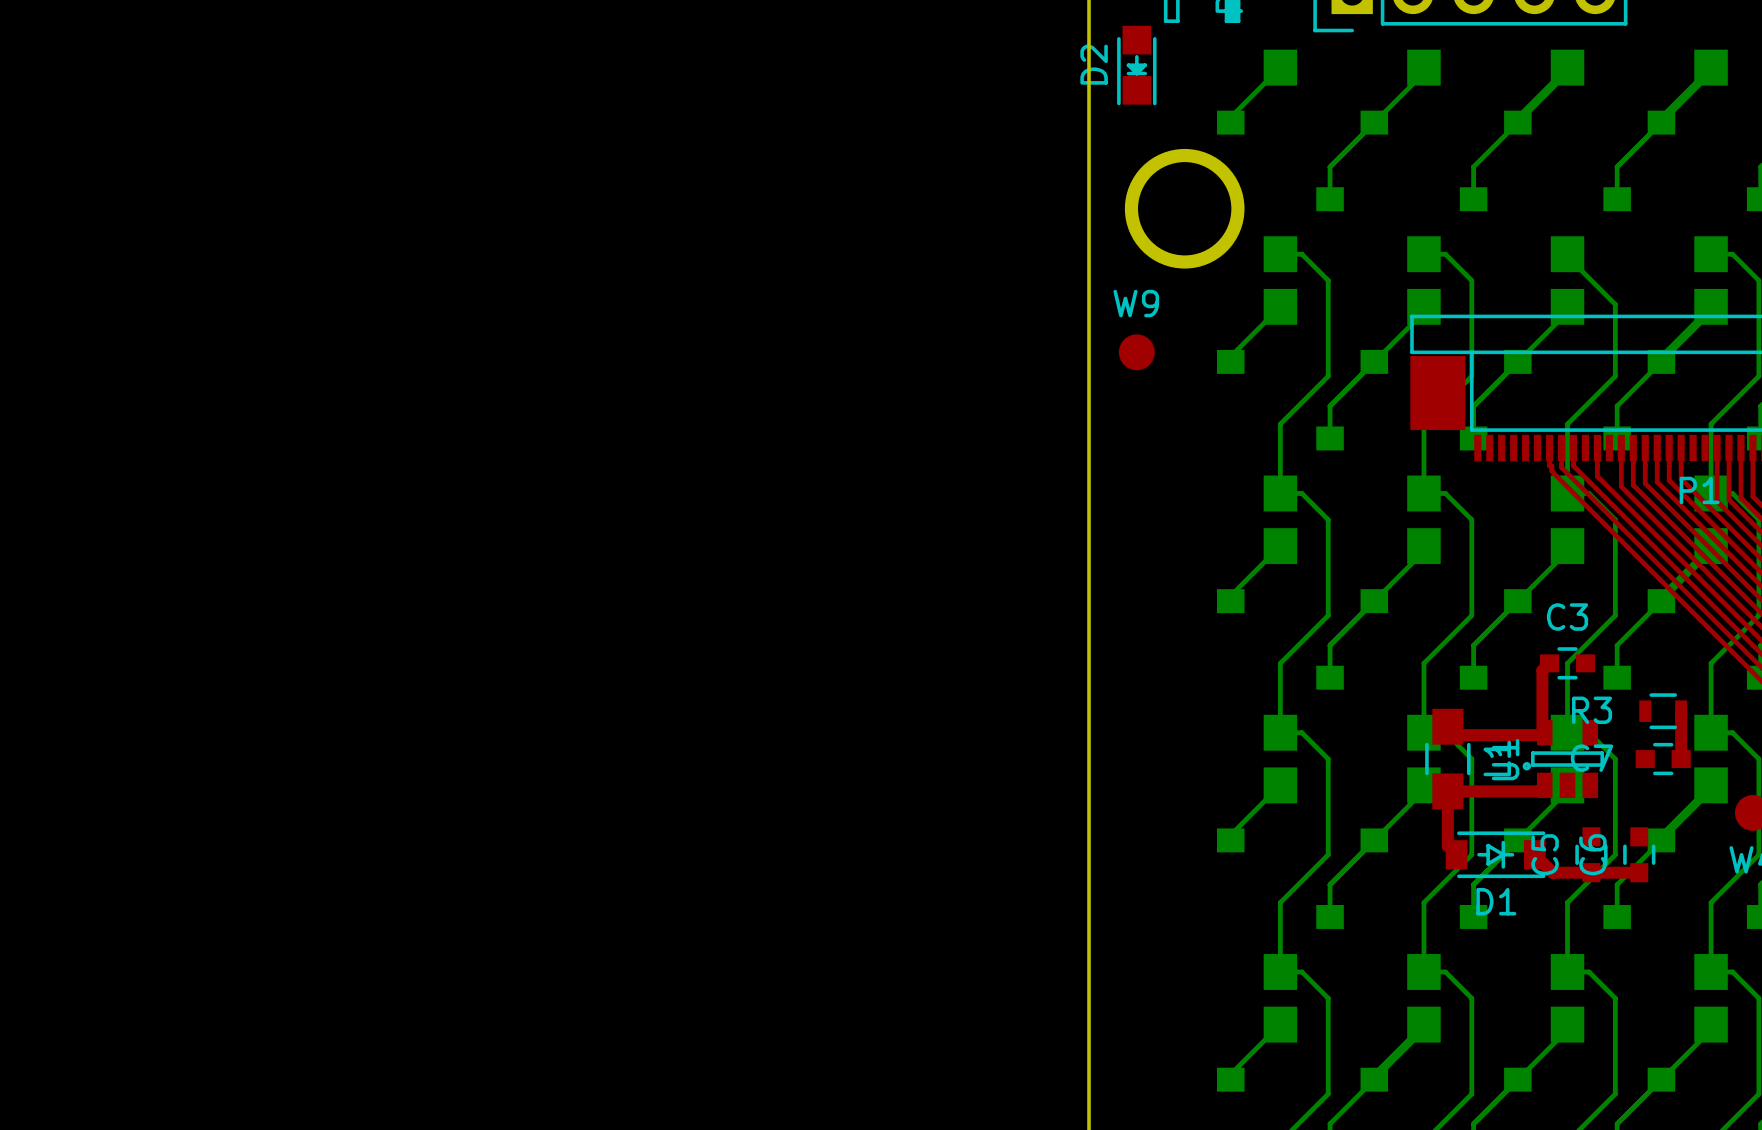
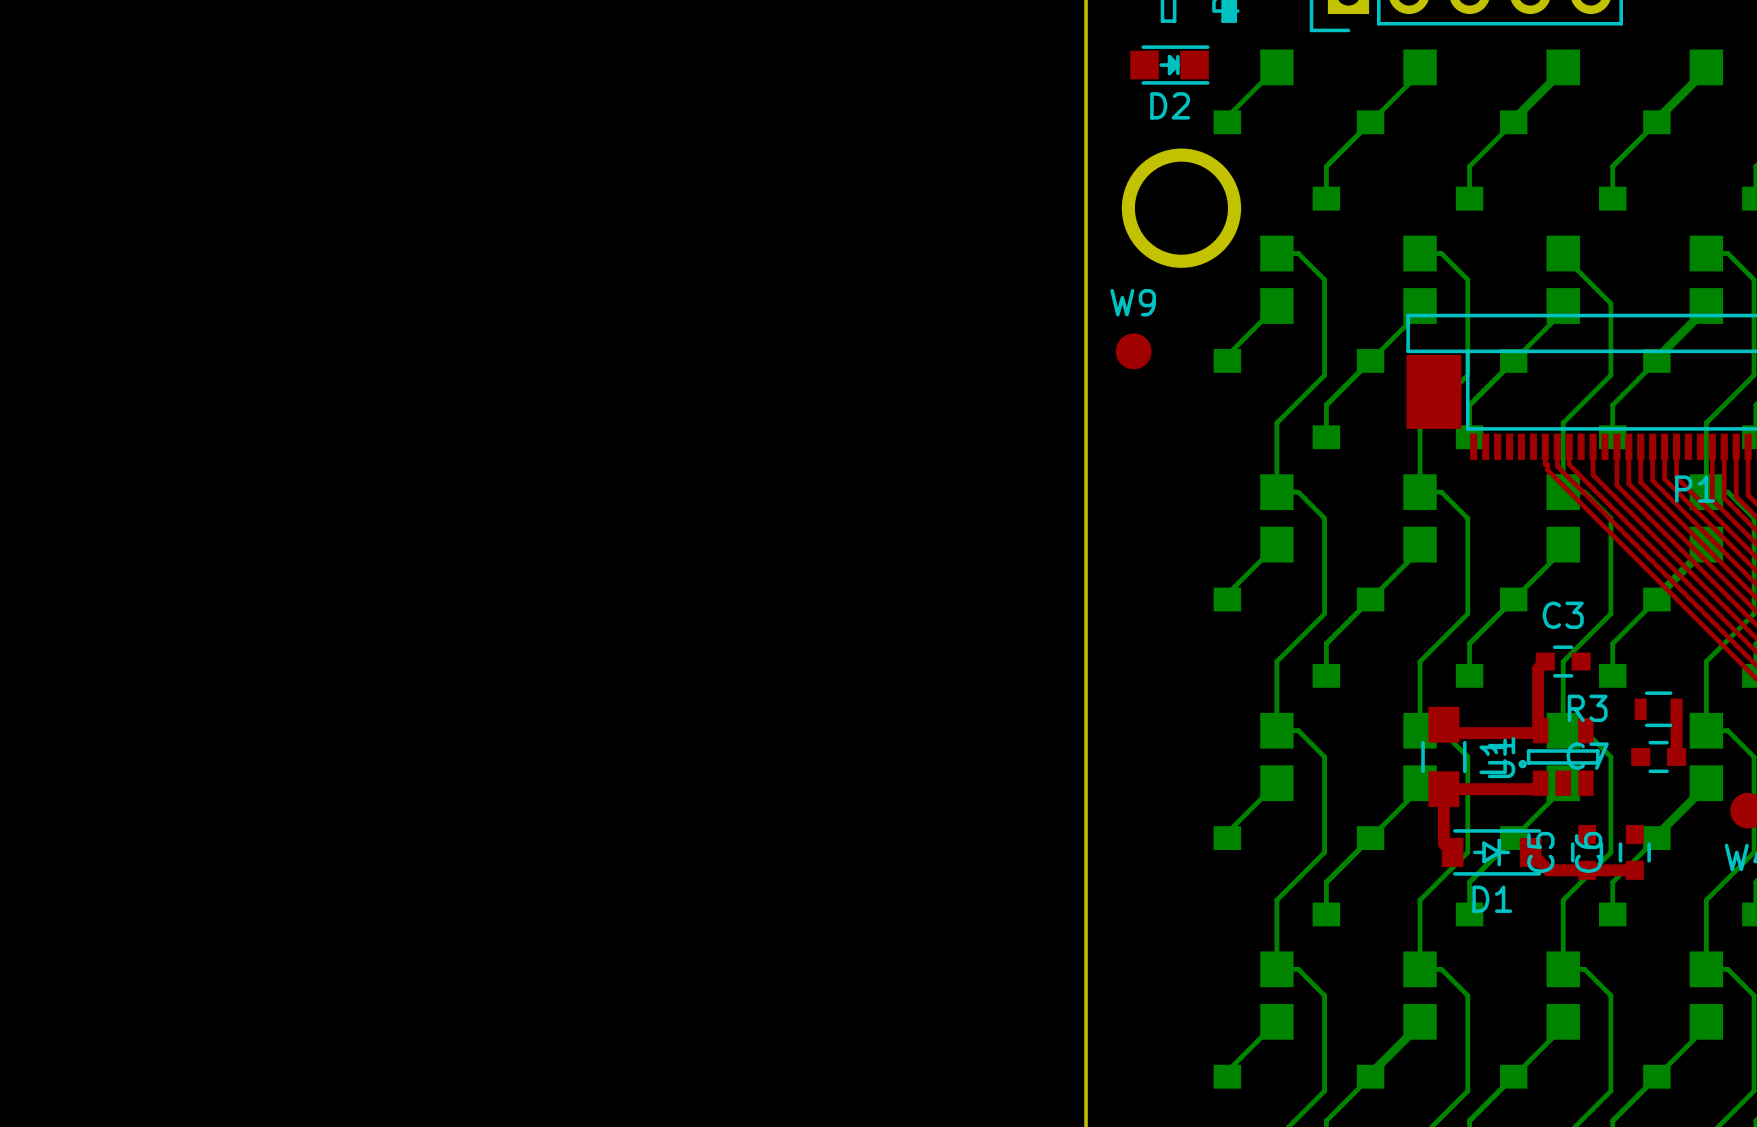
D2 rotation: 0° (1136, 65) -> 90° counterclockwise (1169, 65)

